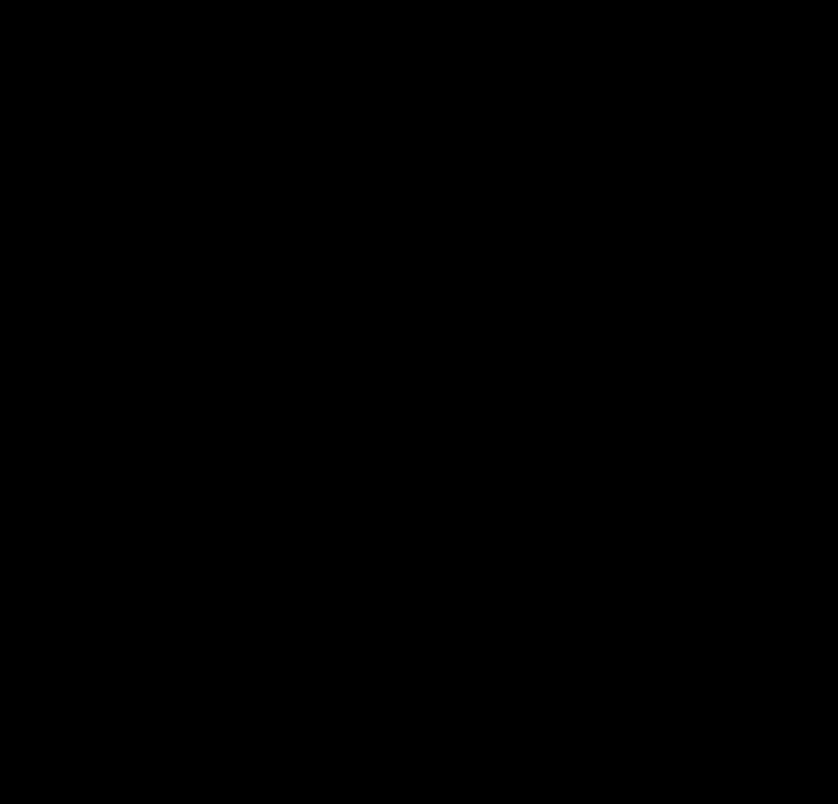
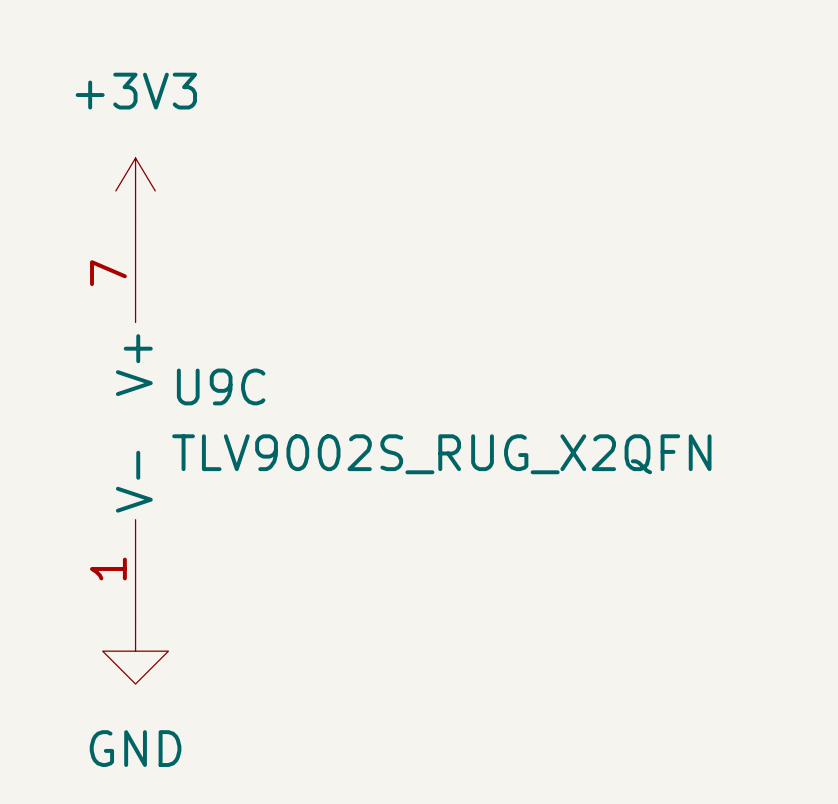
power symbol: none -> +3V3 (135, 190)
U9C: none -> TLV9002S_RUG_X2QFN (135, 421)
power symbol: none -> GND (135, 651)

